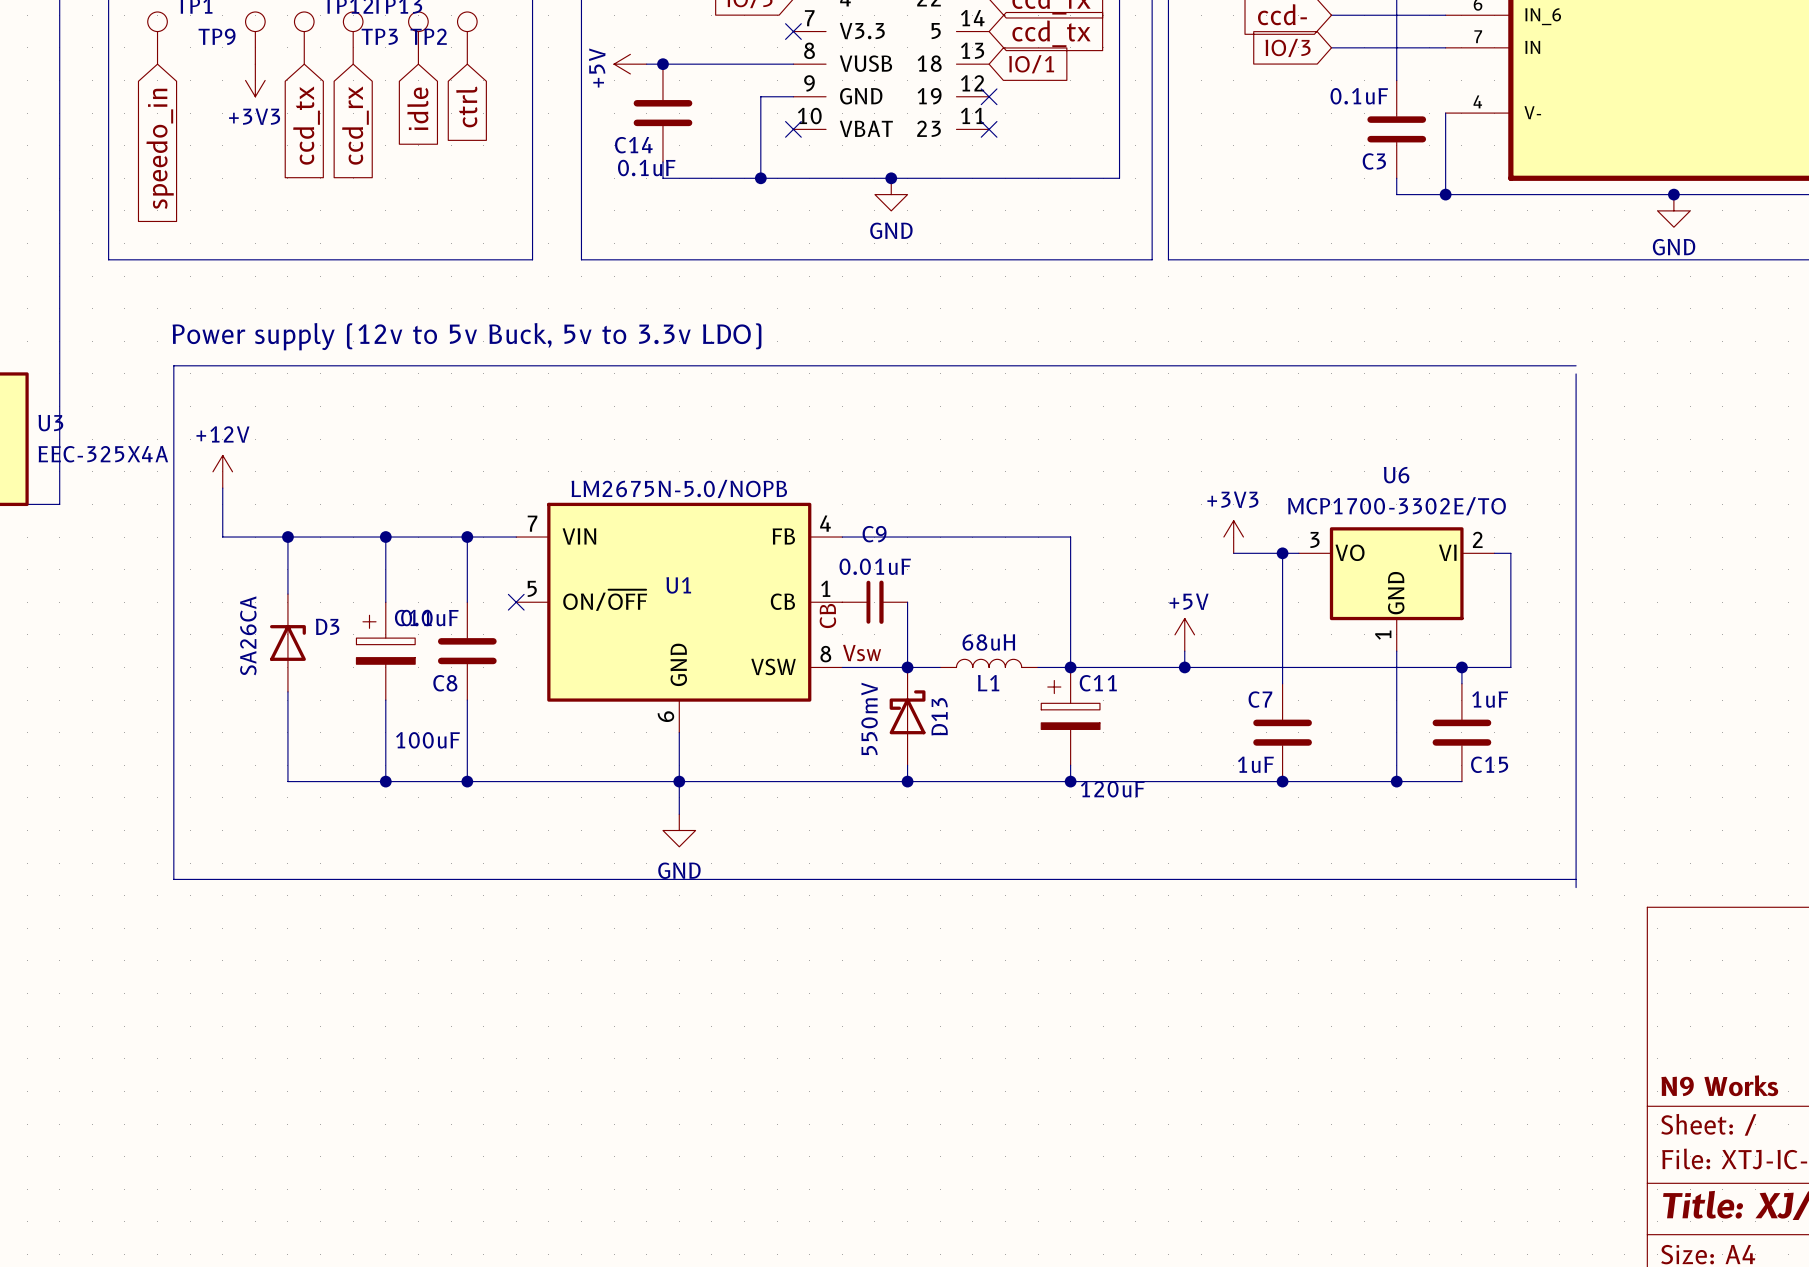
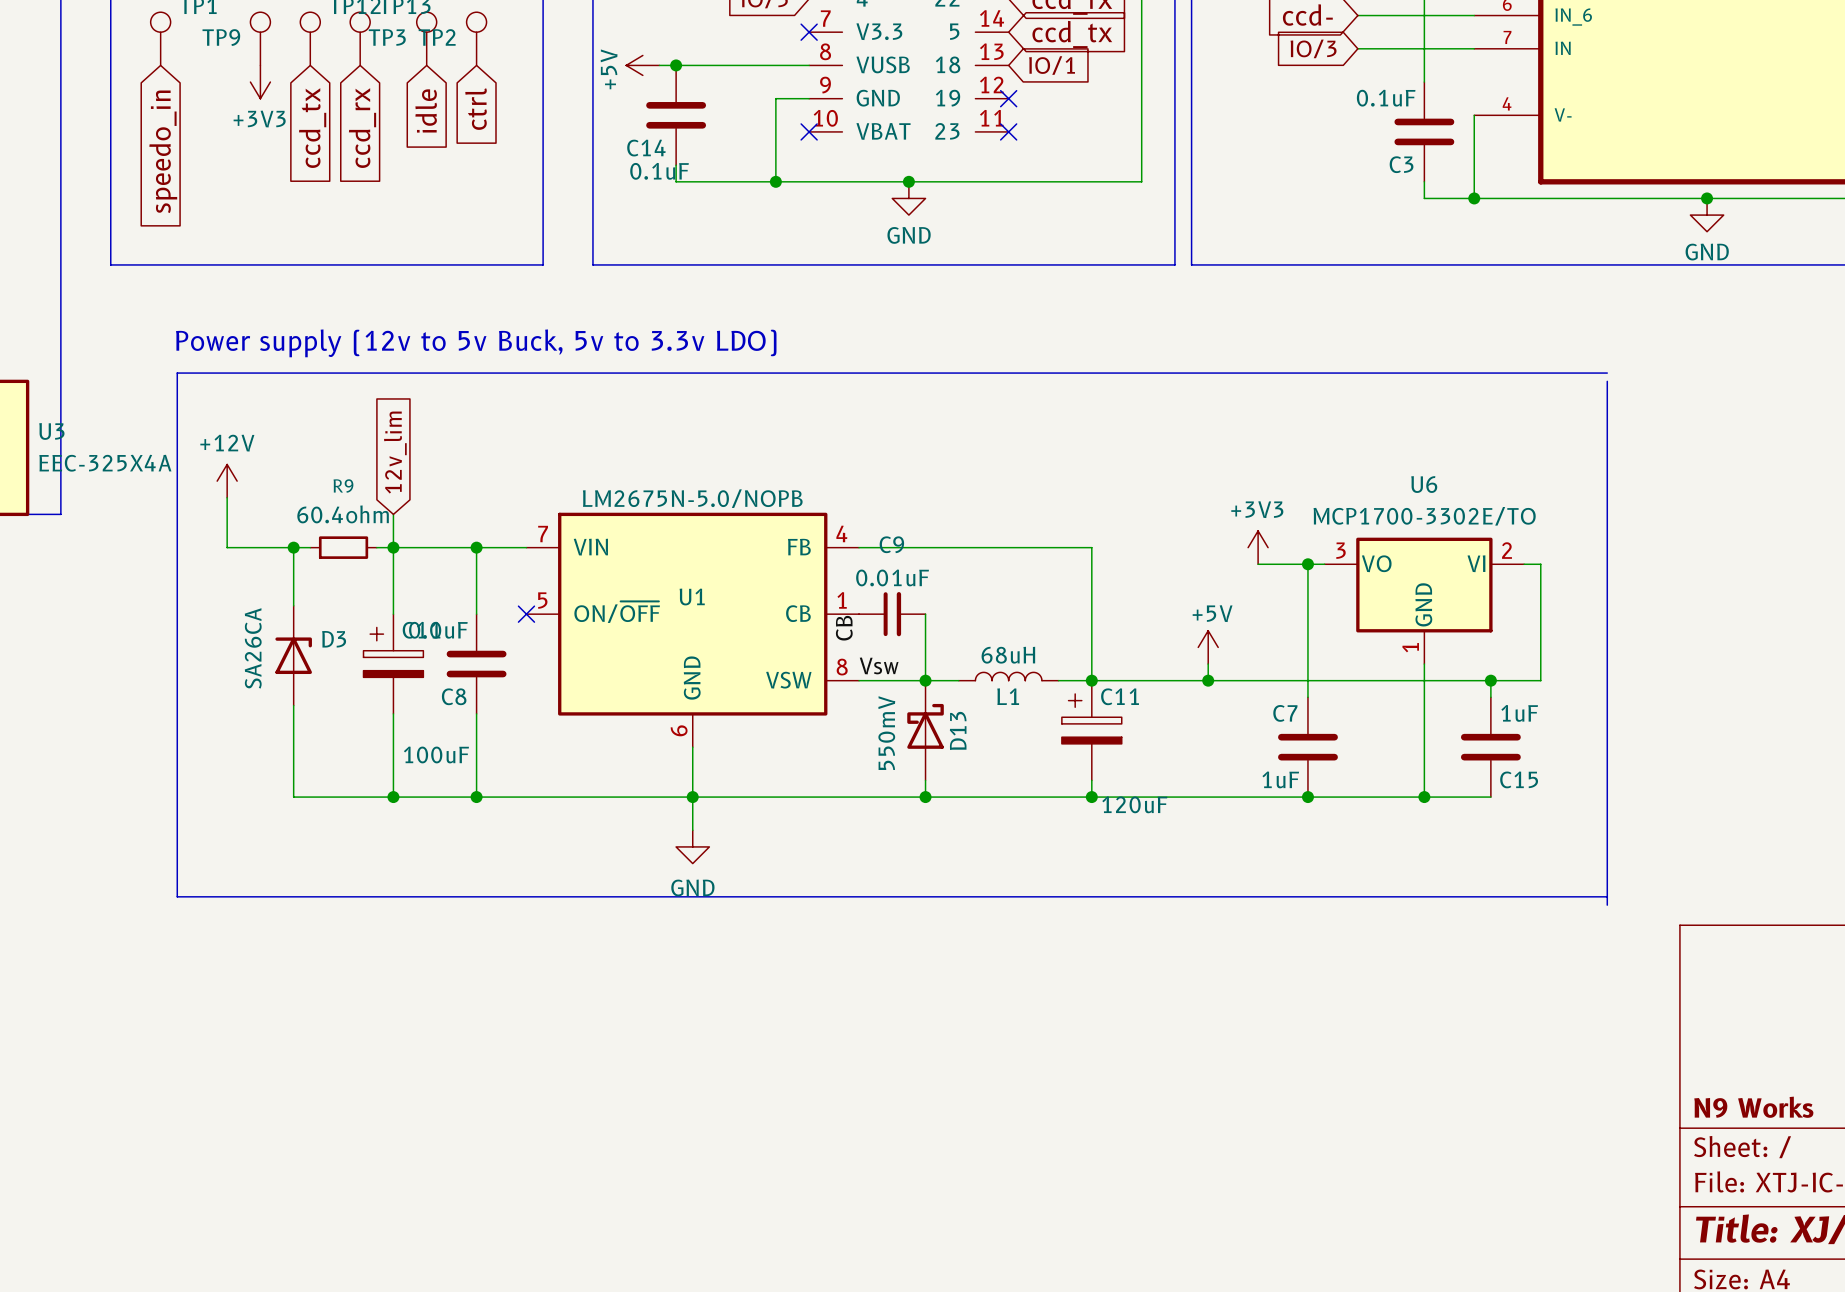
global label: none -> 12v_lim (395, 452)
wire: none -> (393, 514) (393, 547)
wire: (304, 537) (369, 537) -> none
R9: none -> 60.4ohm (343, 547)

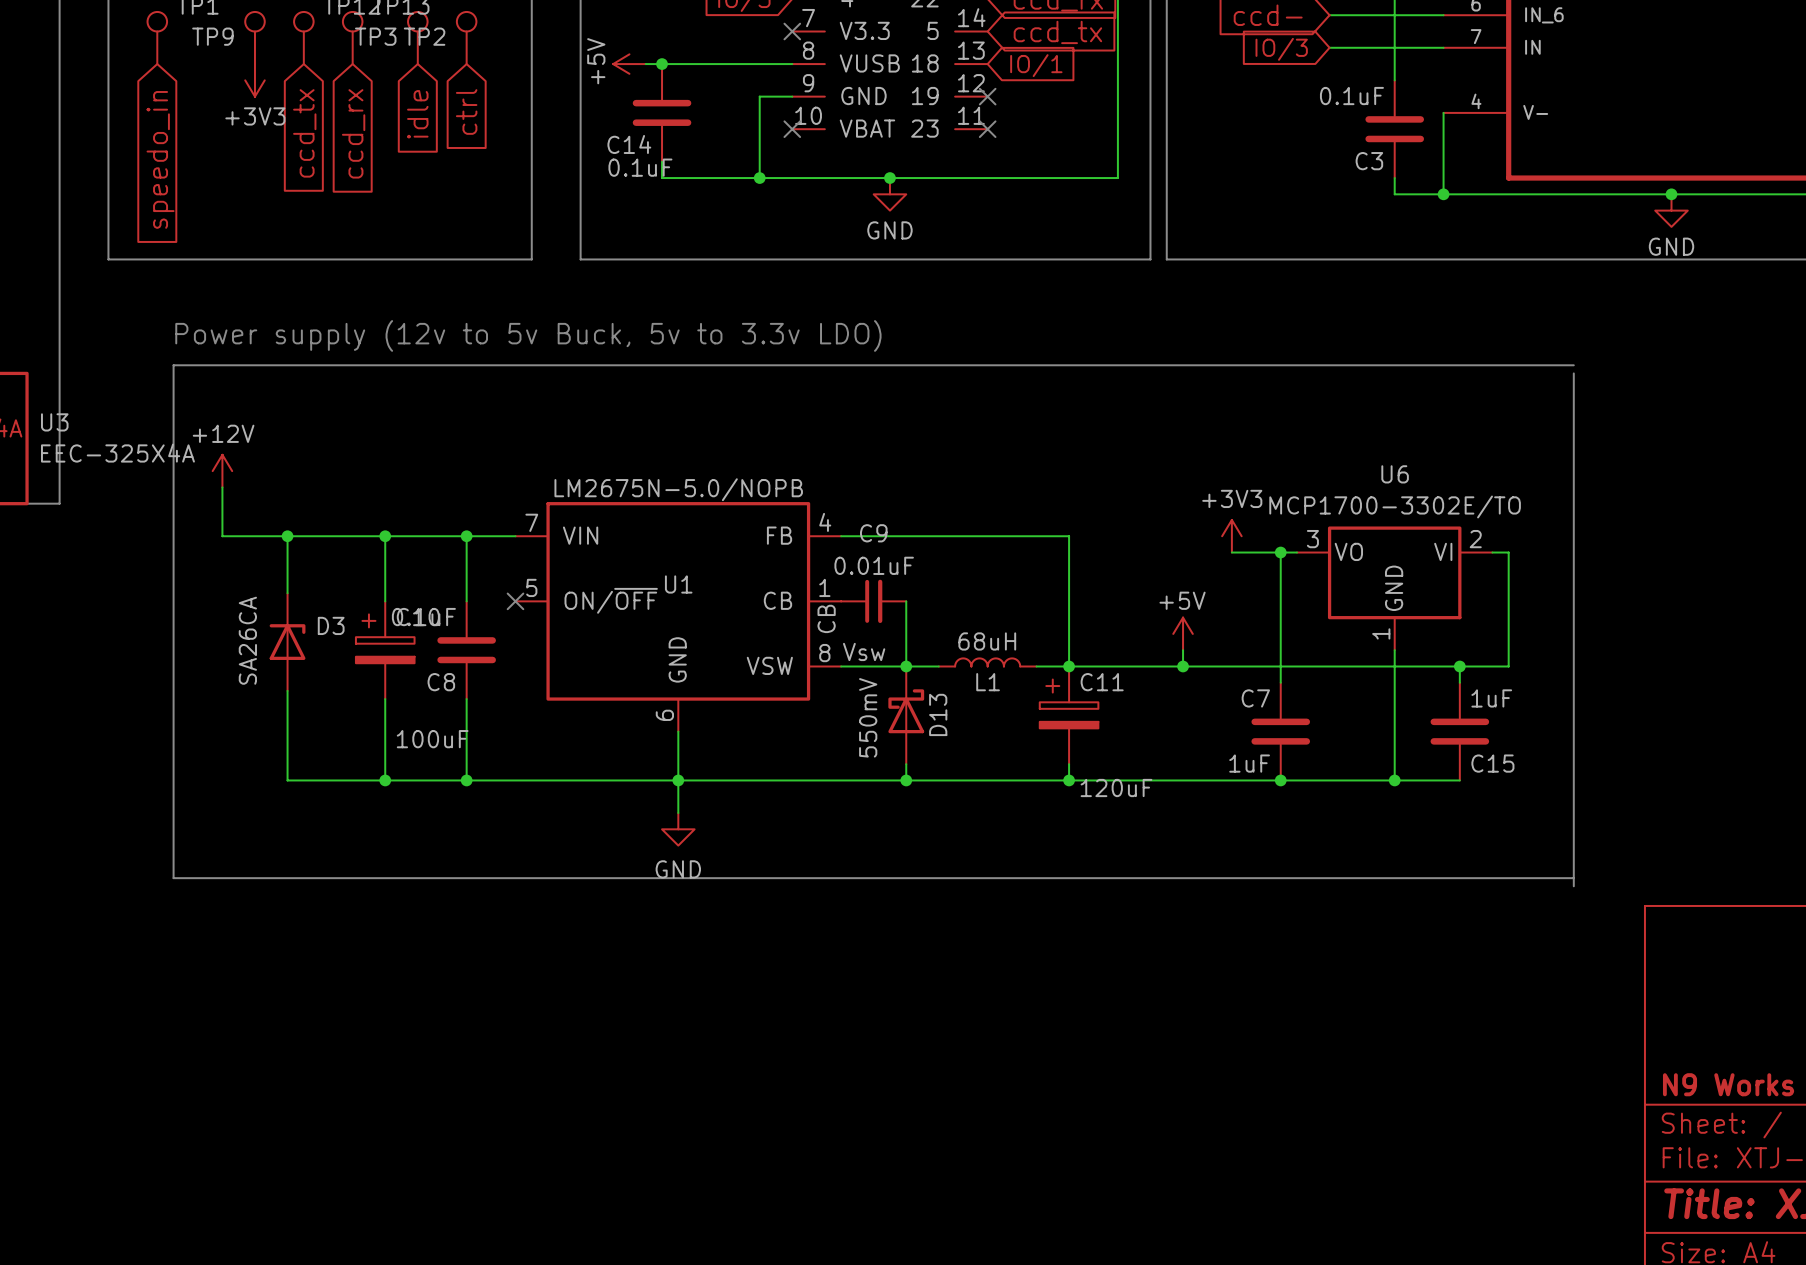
global label: 12v_lim (395, 452) -> none
wire: (393, 514) (393, 547) -> none
wire: none -> (303, 536) (368, 536)
R9: 60.4ohm (343, 547) -> none

